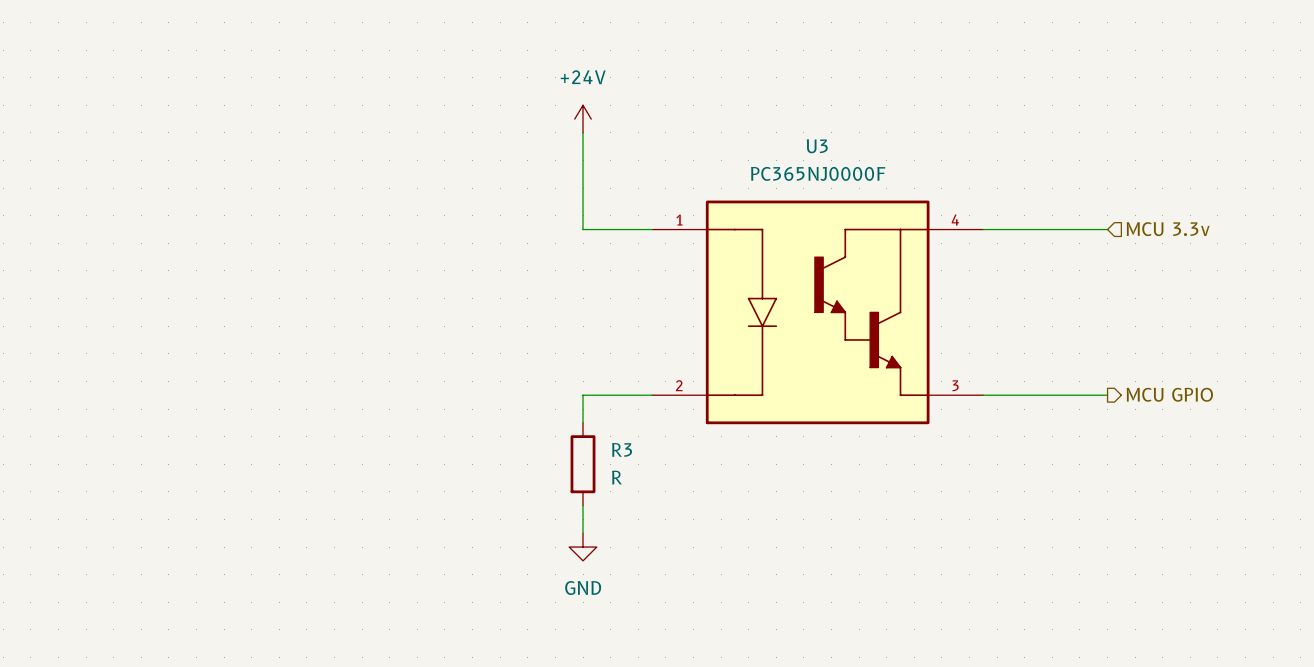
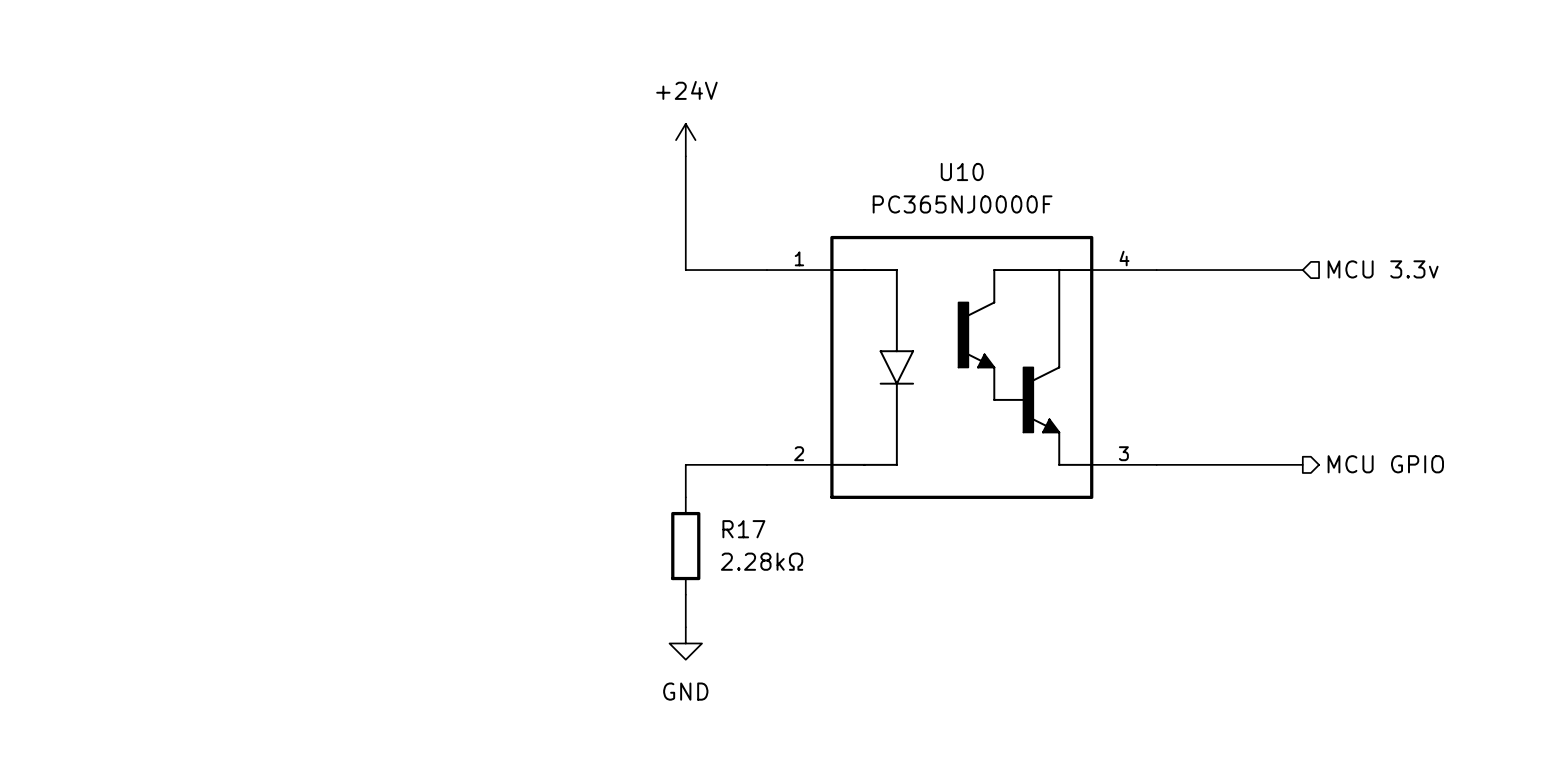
U3 name: U3 (817, 146) -> U10 (962, 171)
R3 name: R3 (622, 449) -> R17 (743, 529)
R3 value: R (616, 477) -> 2.28kΩ (762, 561)

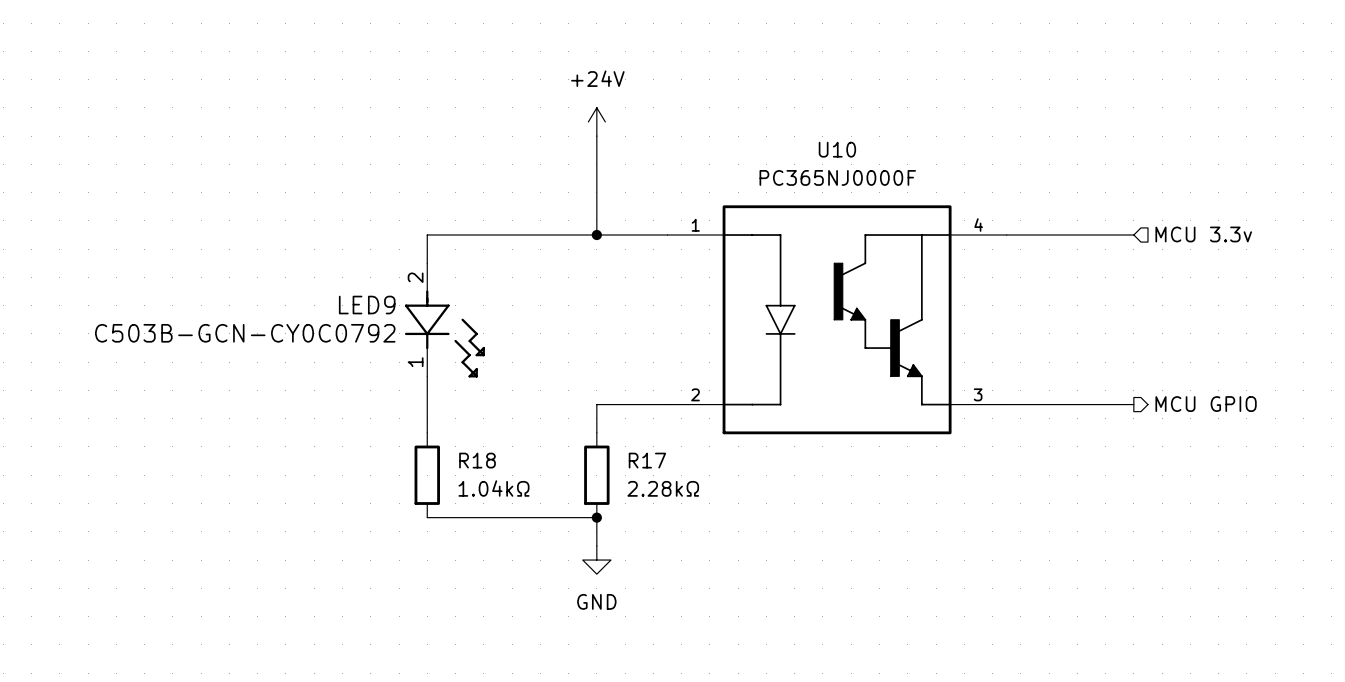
wire: none -> (596, 235) (427, 235) (427, 263)
junction: none -> (596, 235)
LED9: none -> C503B-GCN-CY0C0792 (444, 320)
wire: none -> (427, 376) (427, 432)
R18: none -> 1.04kΩ (427, 475)
wire: none -> (427, 517) (596, 517)
junction: none -> (596, 517)

